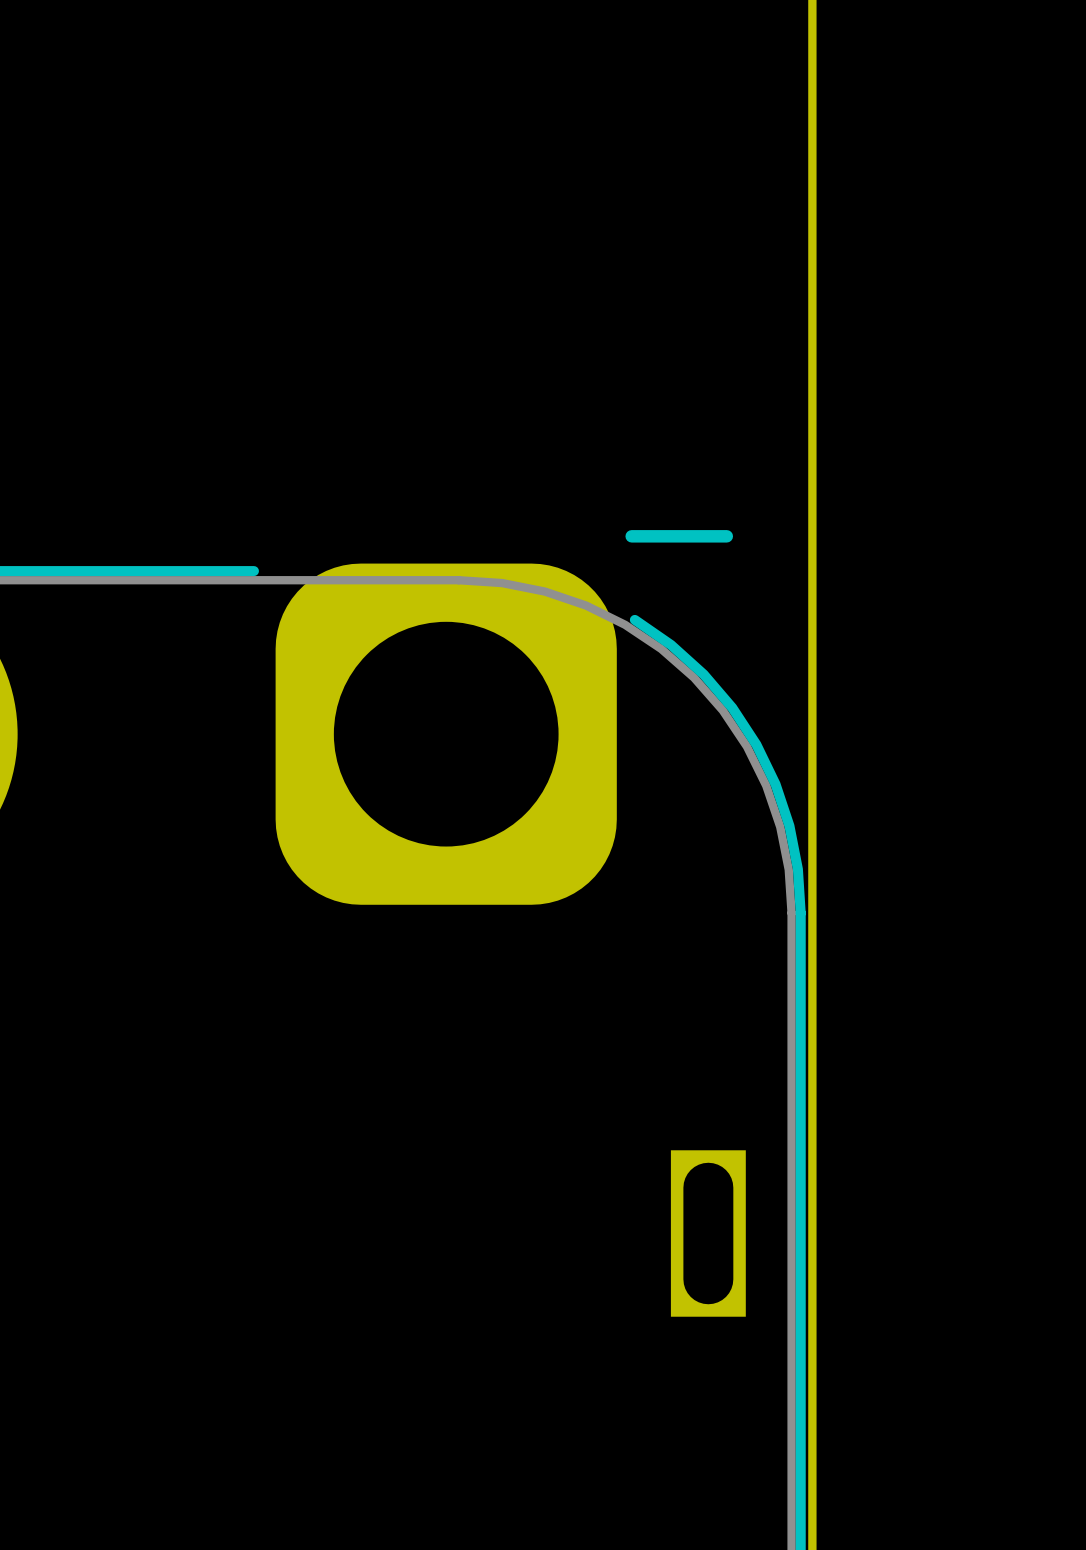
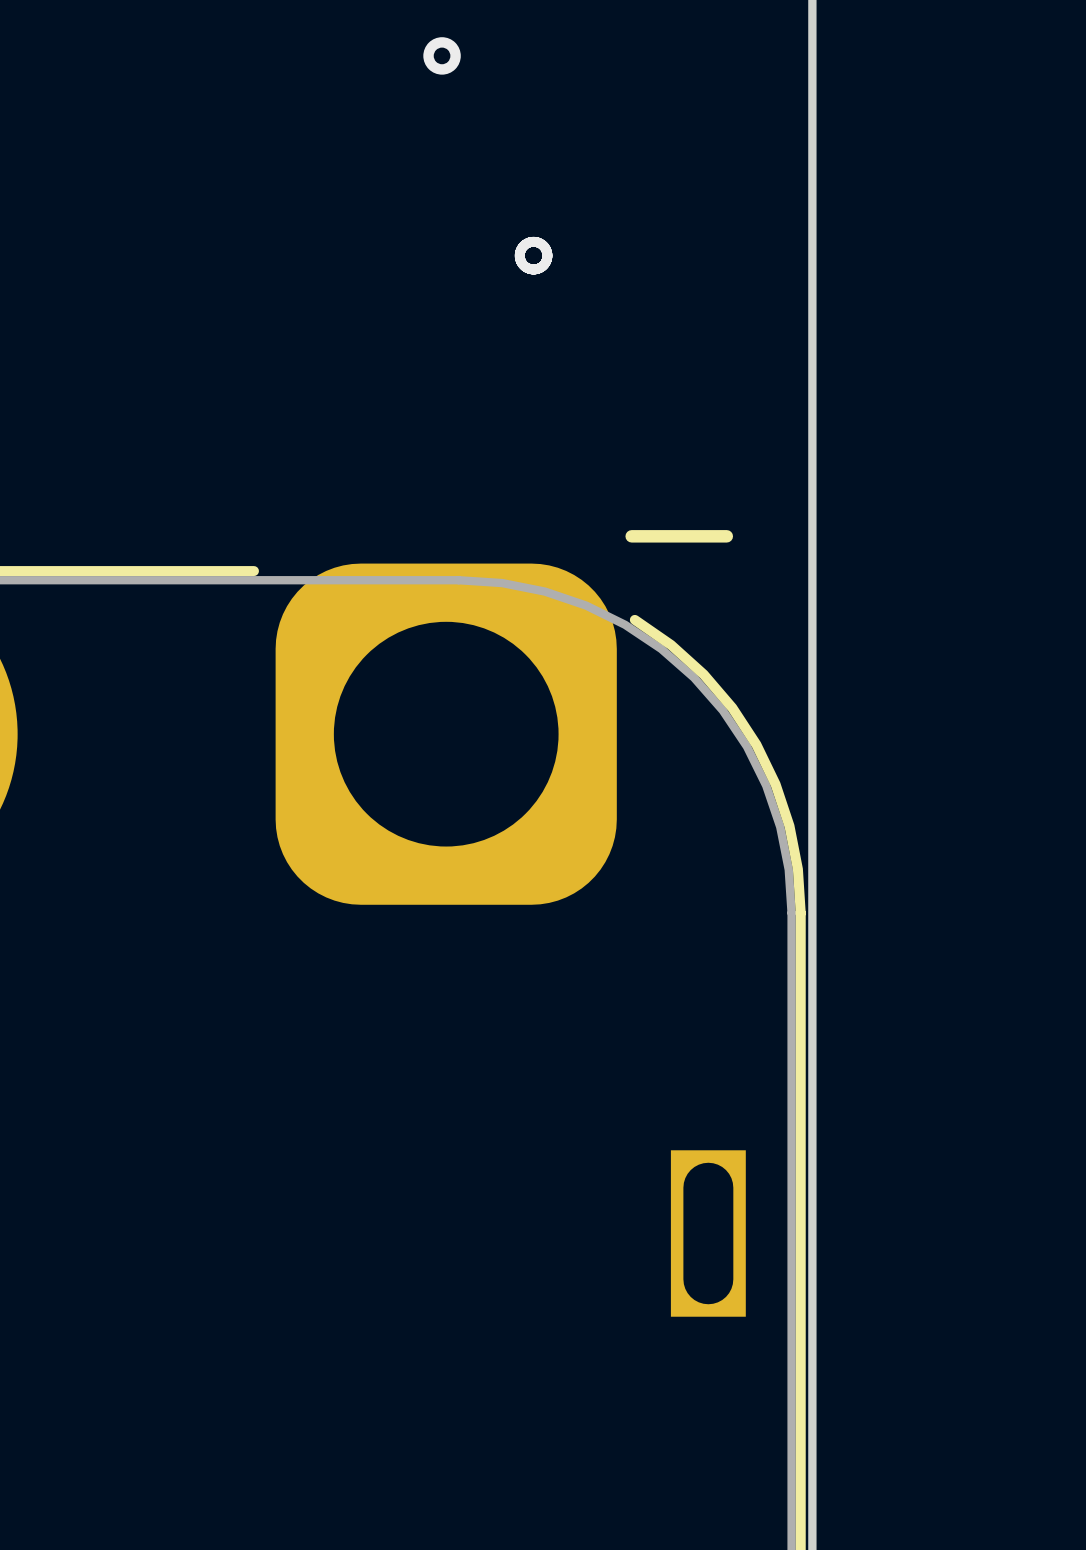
via: none -> (442, 55)
via: none -> (533, 255)

